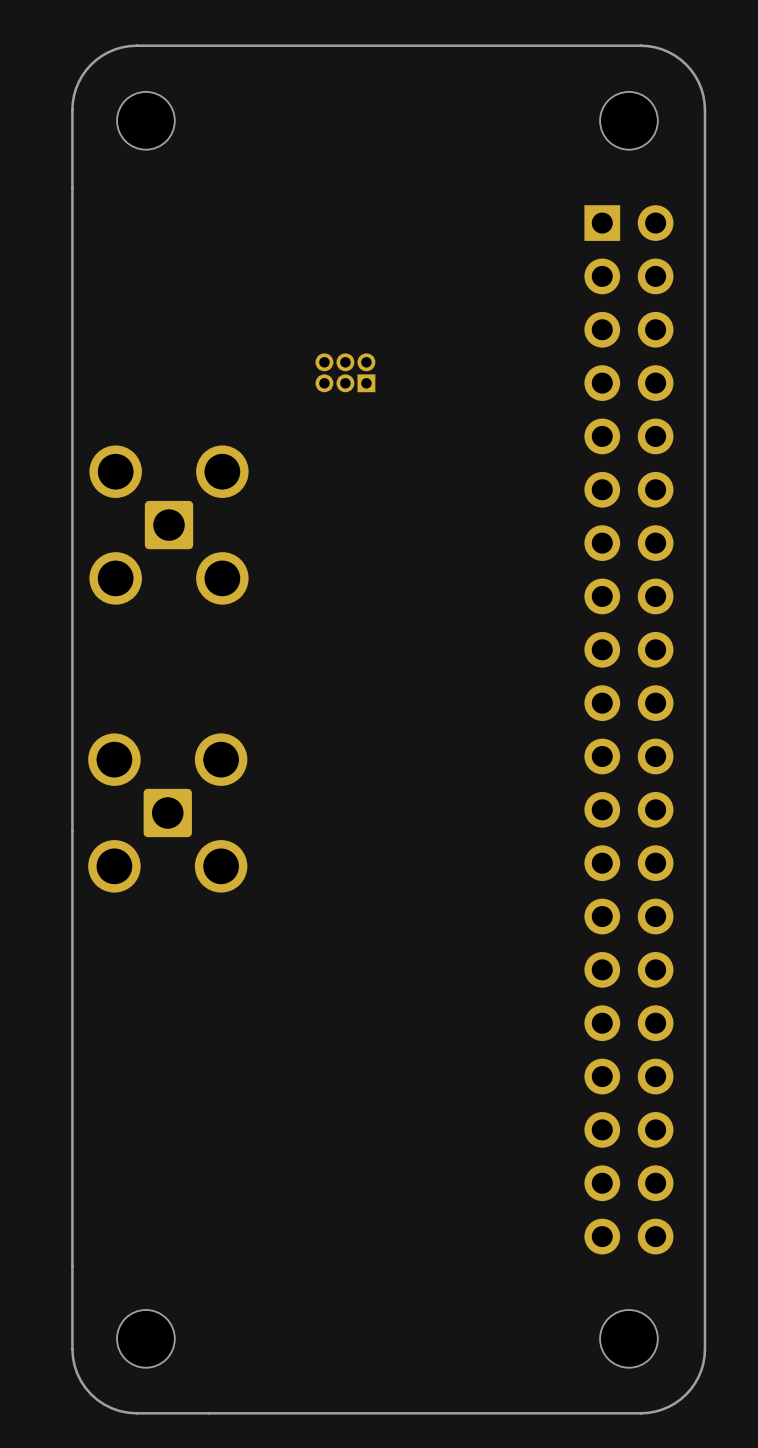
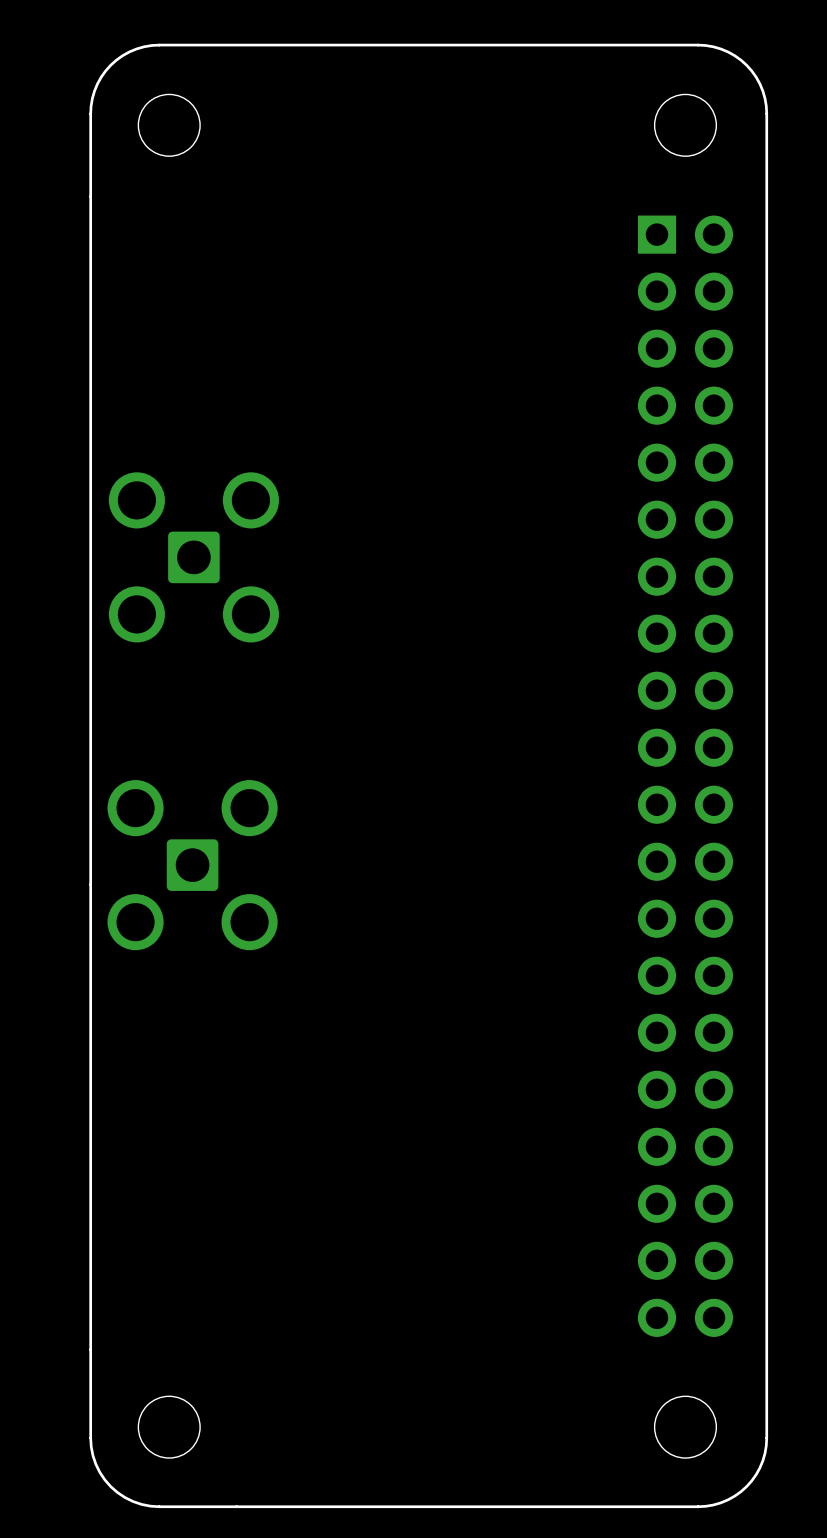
part: (345, 372) -> none

